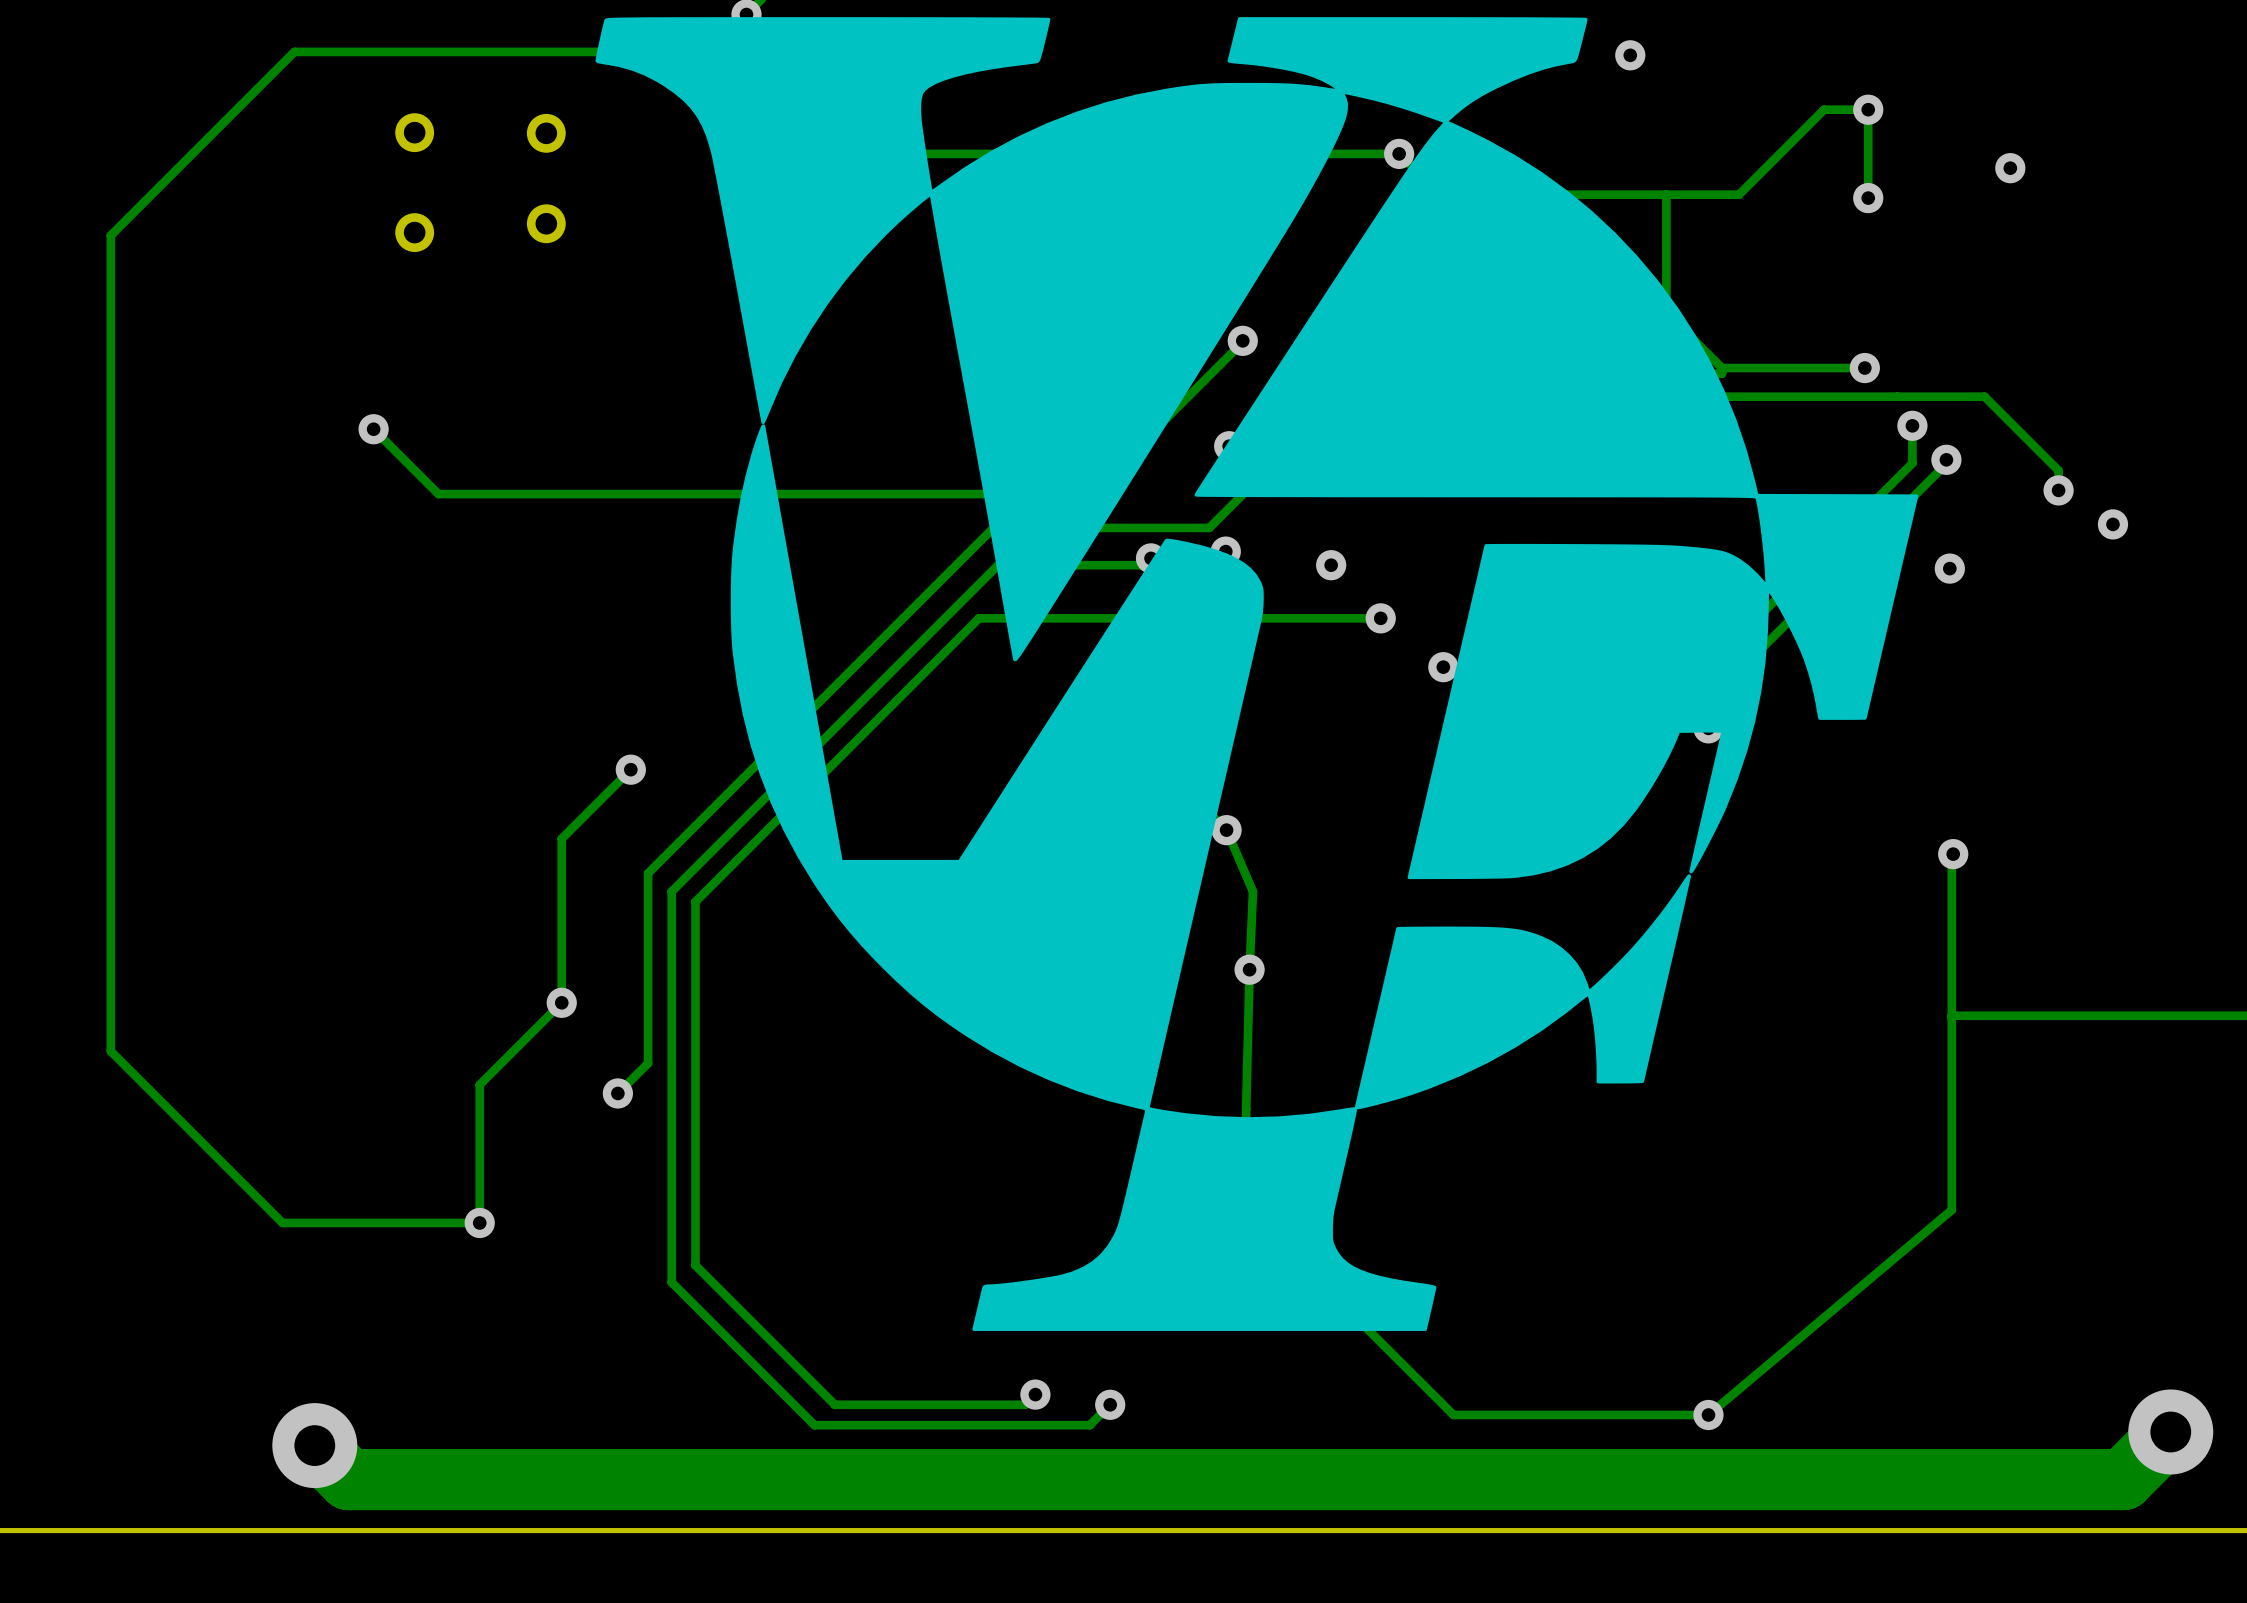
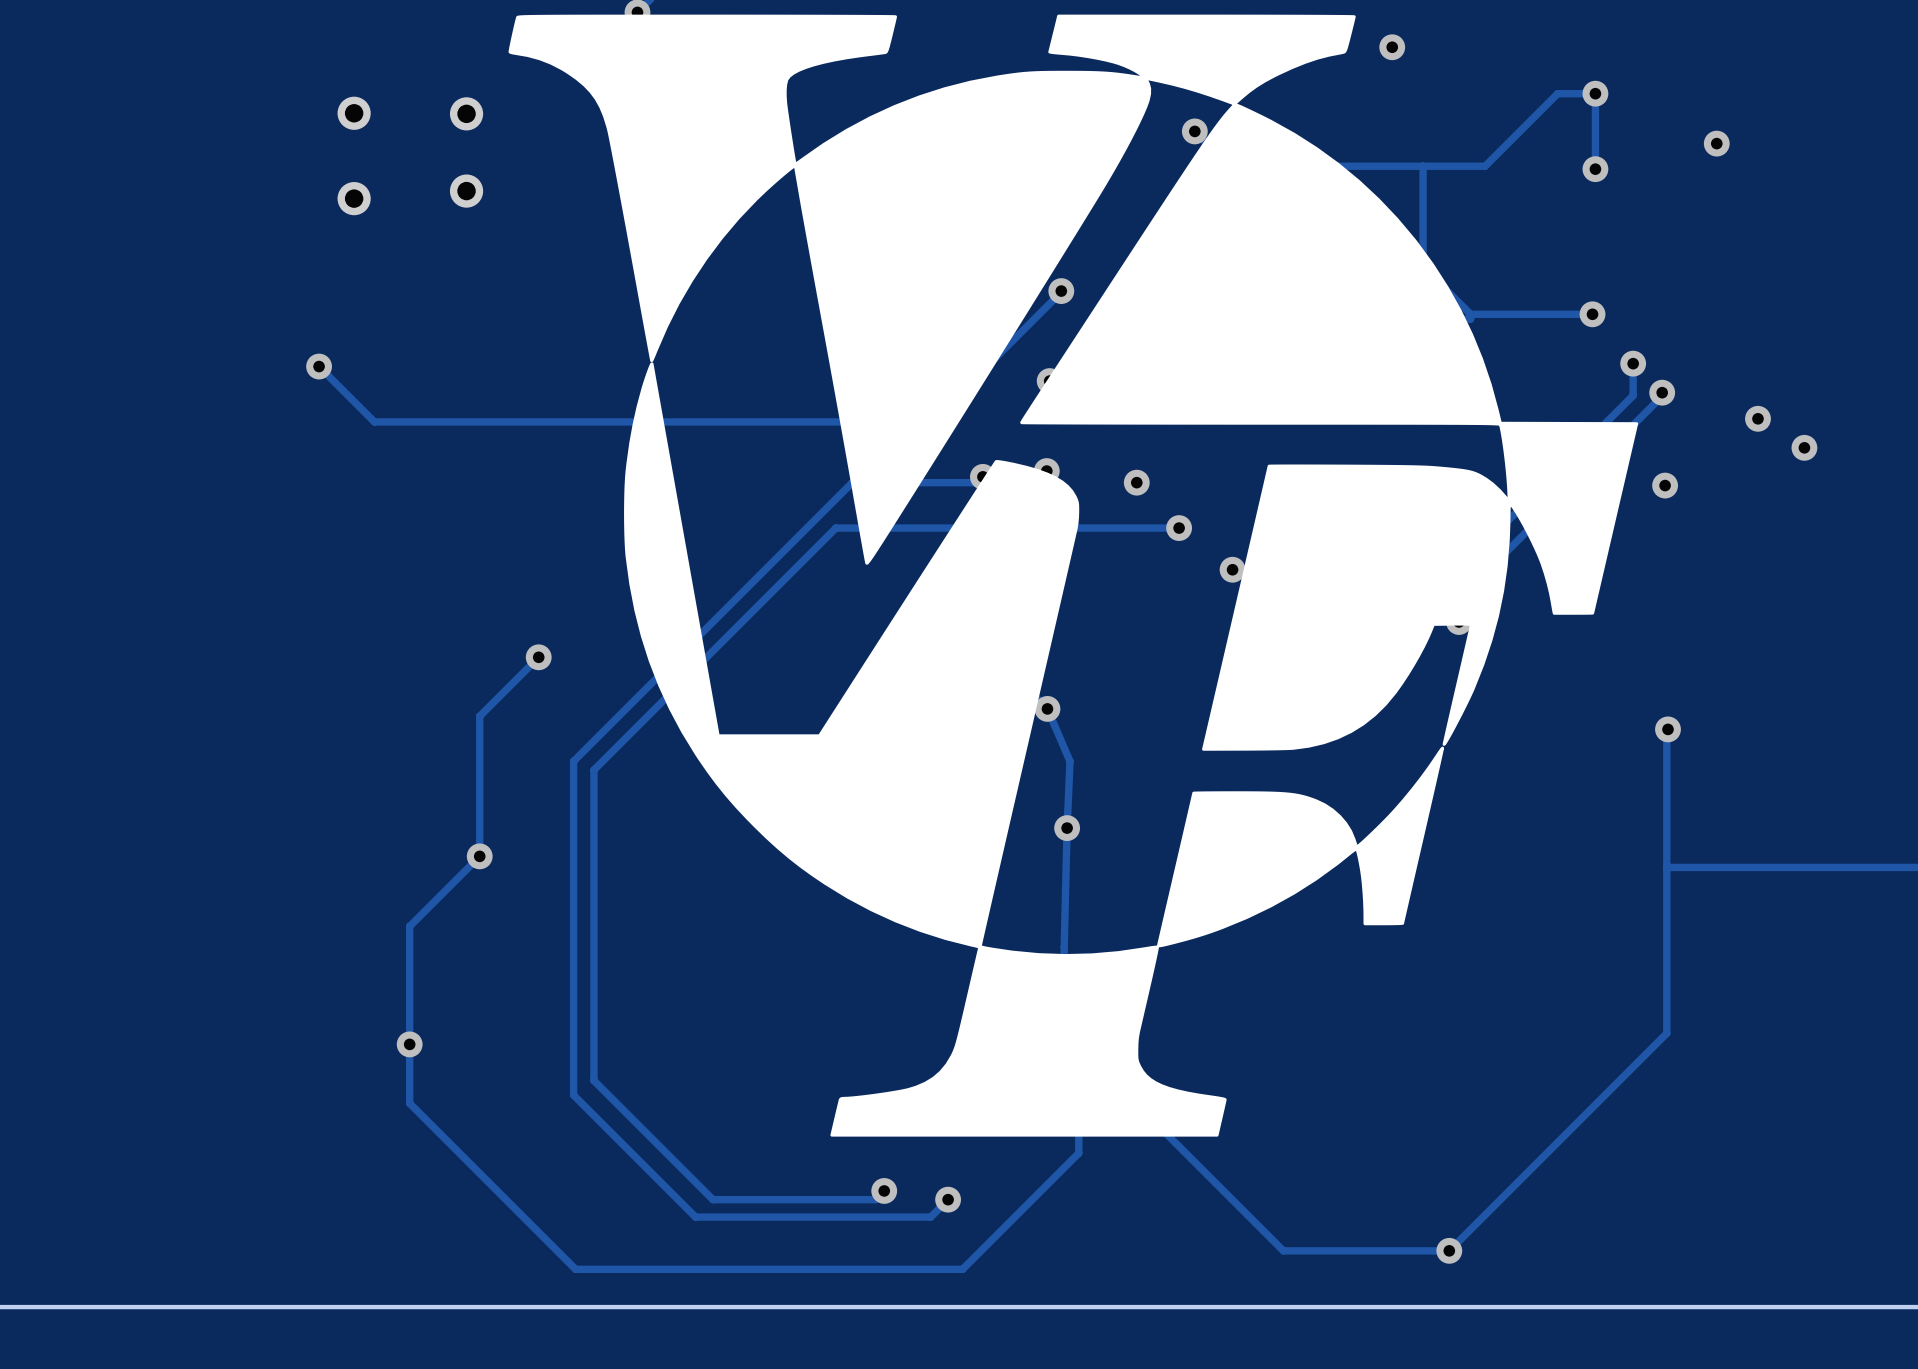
track: (1399, 153) (804, 153) (702, 51) (294, 51) (110, 235) (110, 1051) (282, 1222) (479, 1222) -> none
track: (2058, 490) (2058, 470) (1984, 396) (1340, 396) (1209, 527) (993, 527) (648, 873) (648, 1063) (617, 1093) -> none
via: (617, 1093) -> none
track: (1951, 1210) (1708, 1414) (1453, 1414) (1263, 1225) -> (1666, 1033) (1449, 1250) (1283, 1250) (1078, 1046) (1078, 1153) (962, 1269) (575, 1269) (409, 1103) (409, 1044)
via position: (1708, 1414) -> (1449, 1250)
track: (2170, 1431) (2123, 1479) (348, 1479) (314, 1445) -> none
via: (2170, 1431) -> none
via: (314, 1445) -> none

